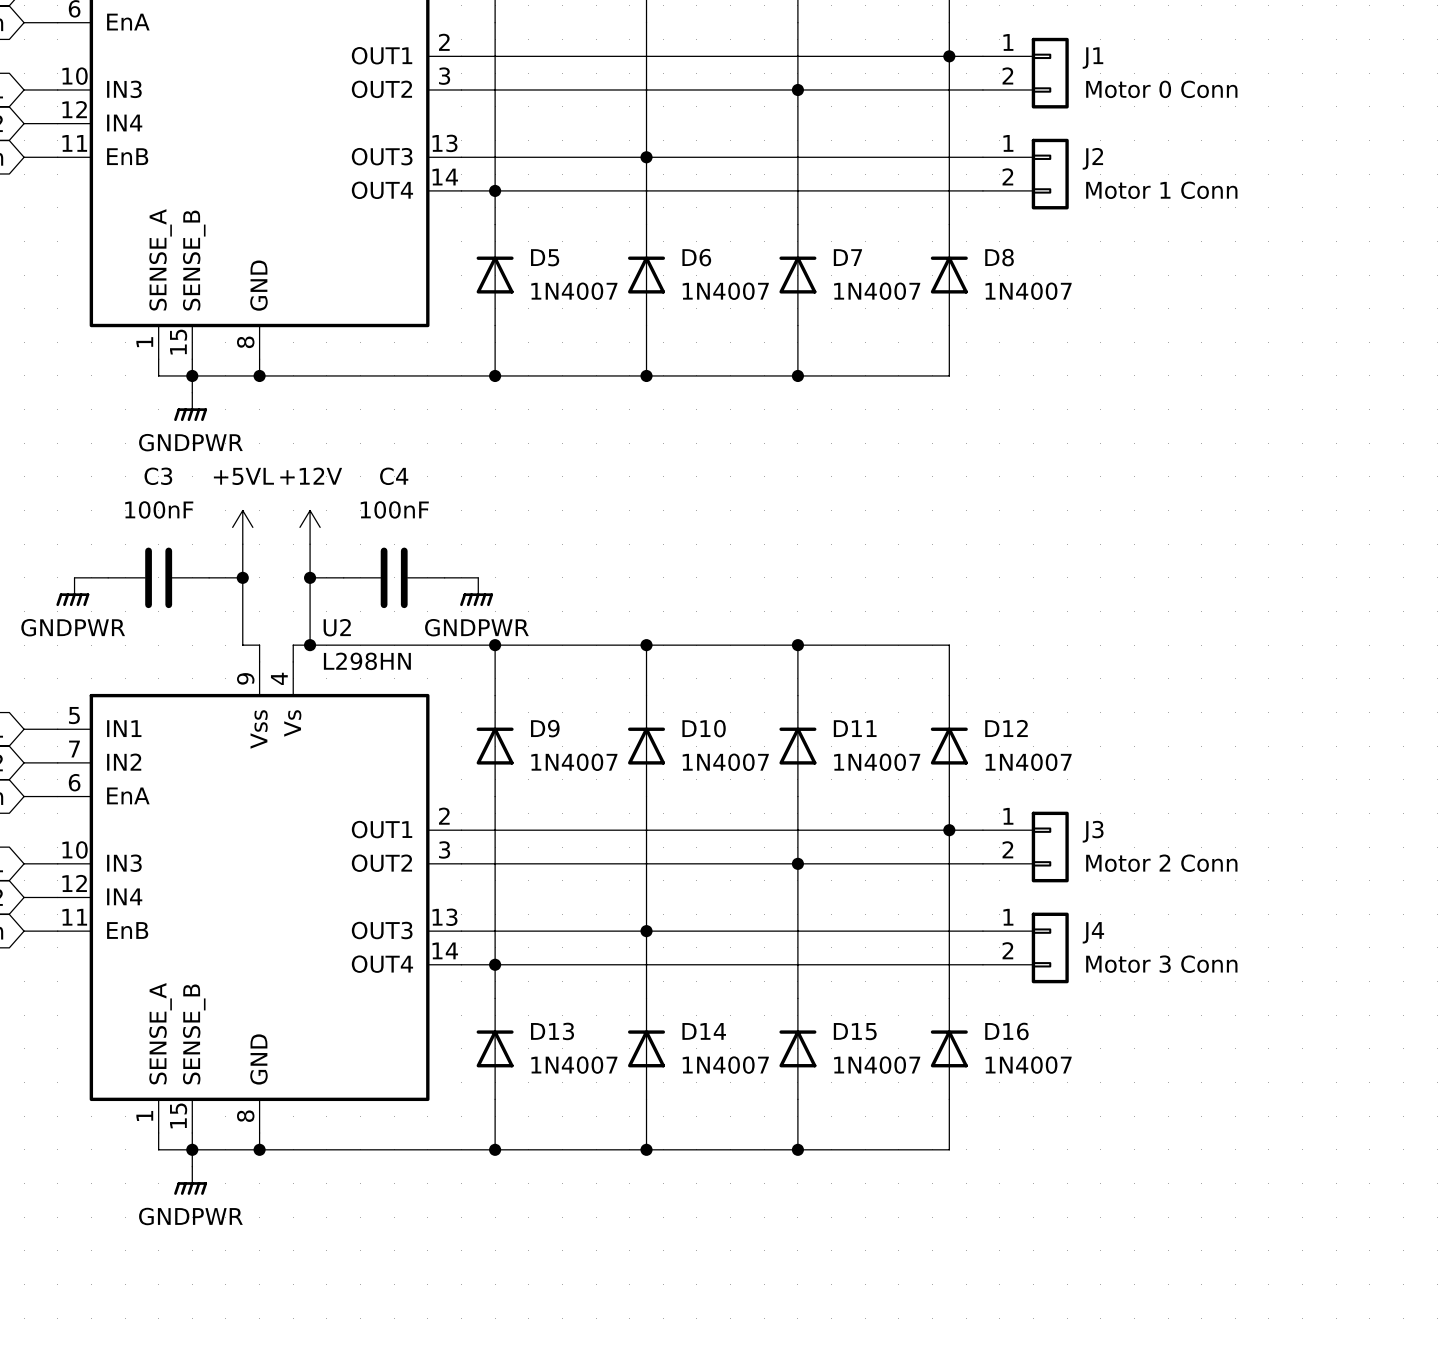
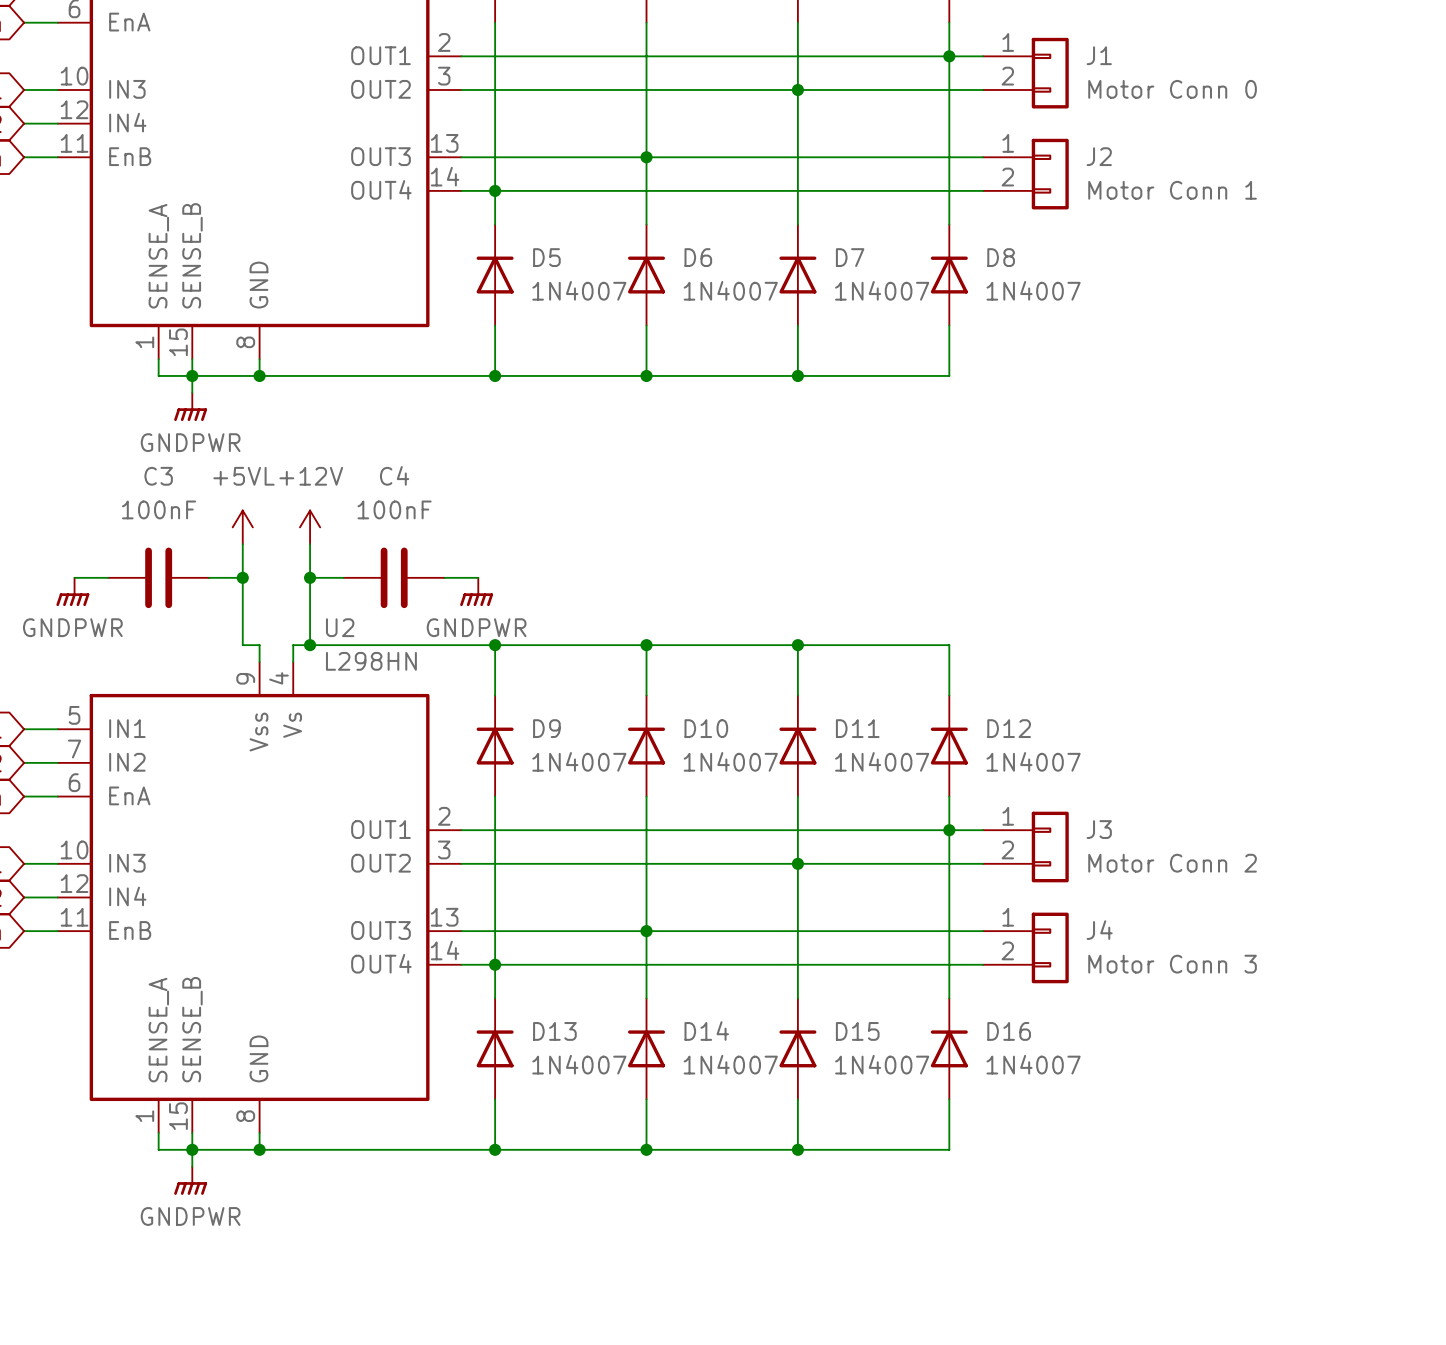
J1 value: Motor 0 Conn (1161, 89) -> Motor Conn 0 (1172, 89)
J2 value: Motor 1 Conn (1161, 190) -> Motor Conn 1 (1172, 190)
J3 value: Motor 2 Conn (1161, 863) -> Motor Conn 2 (1172, 863)
J4 value: Motor 3 Conn (1161, 964) -> Motor Conn 3 (1172, 964)

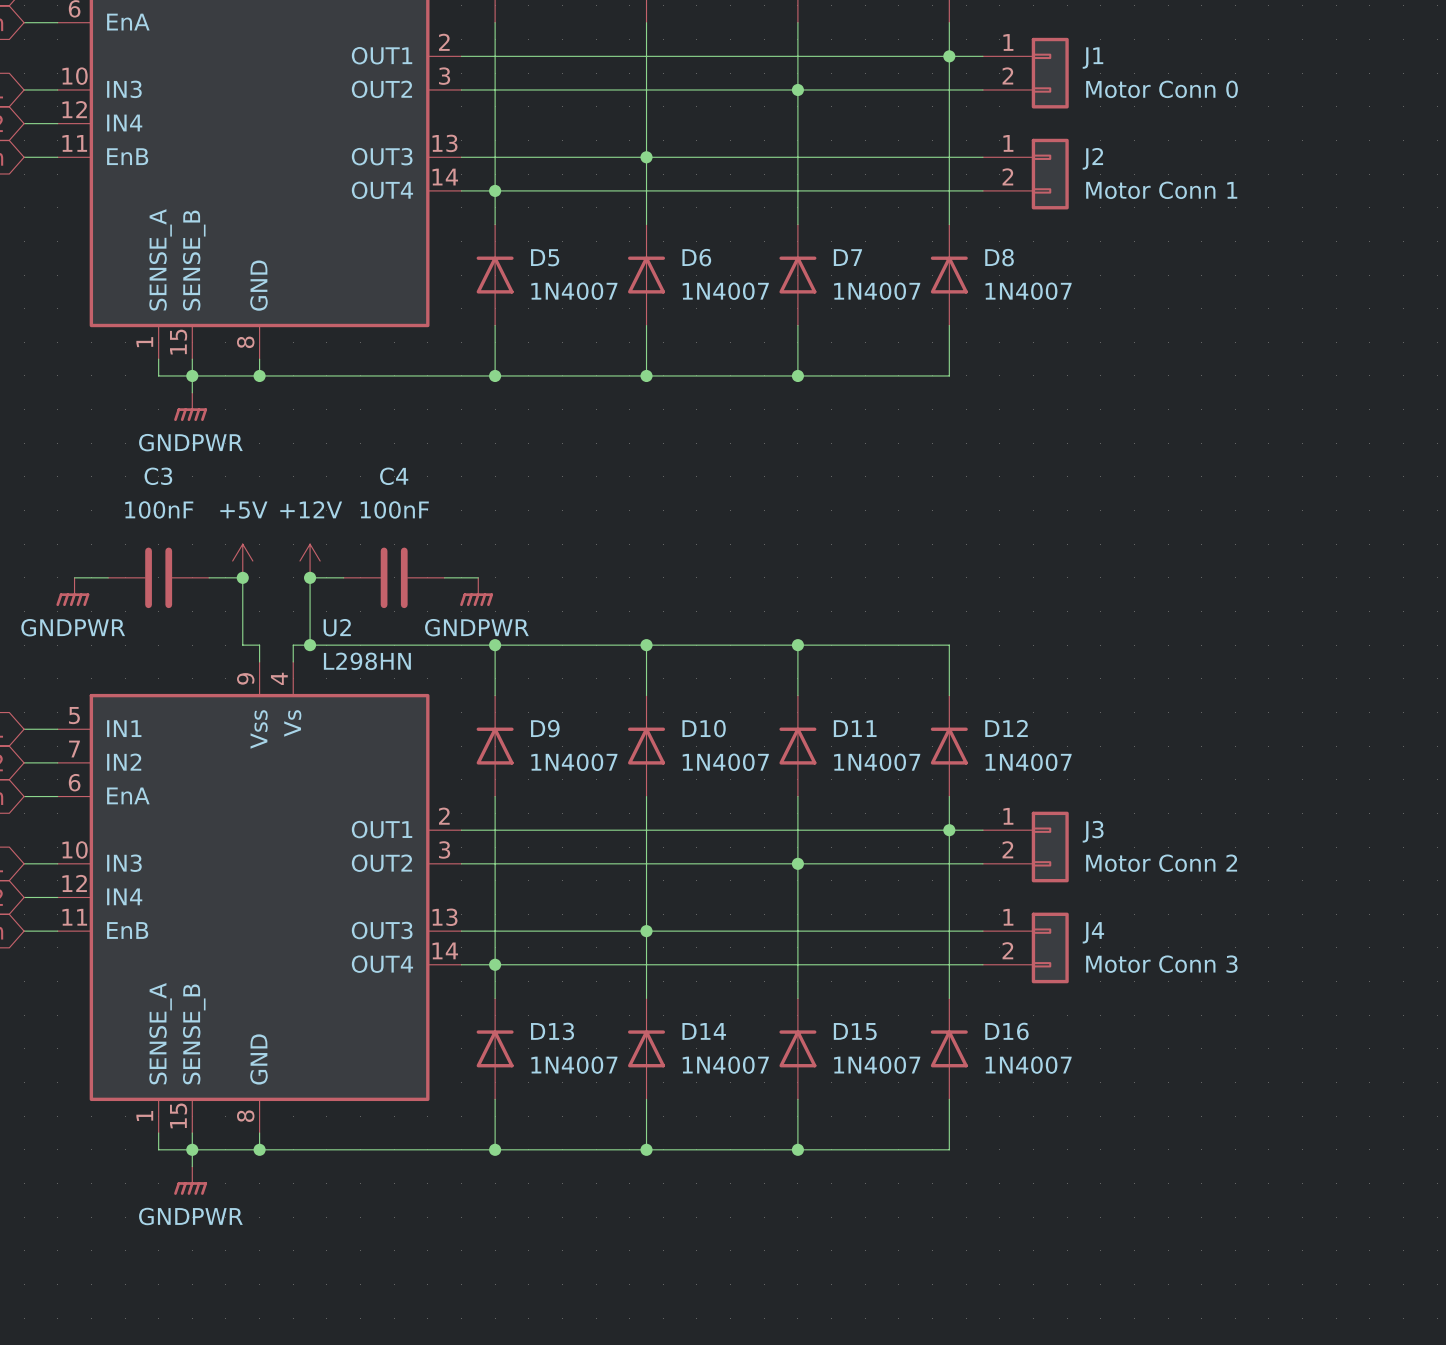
power symbol: +5VL (242, 527) -> none
power symbol position: +12V (310, 527) -> +12V (310, 561)
power symbol: none -> +5V (242, 561)

